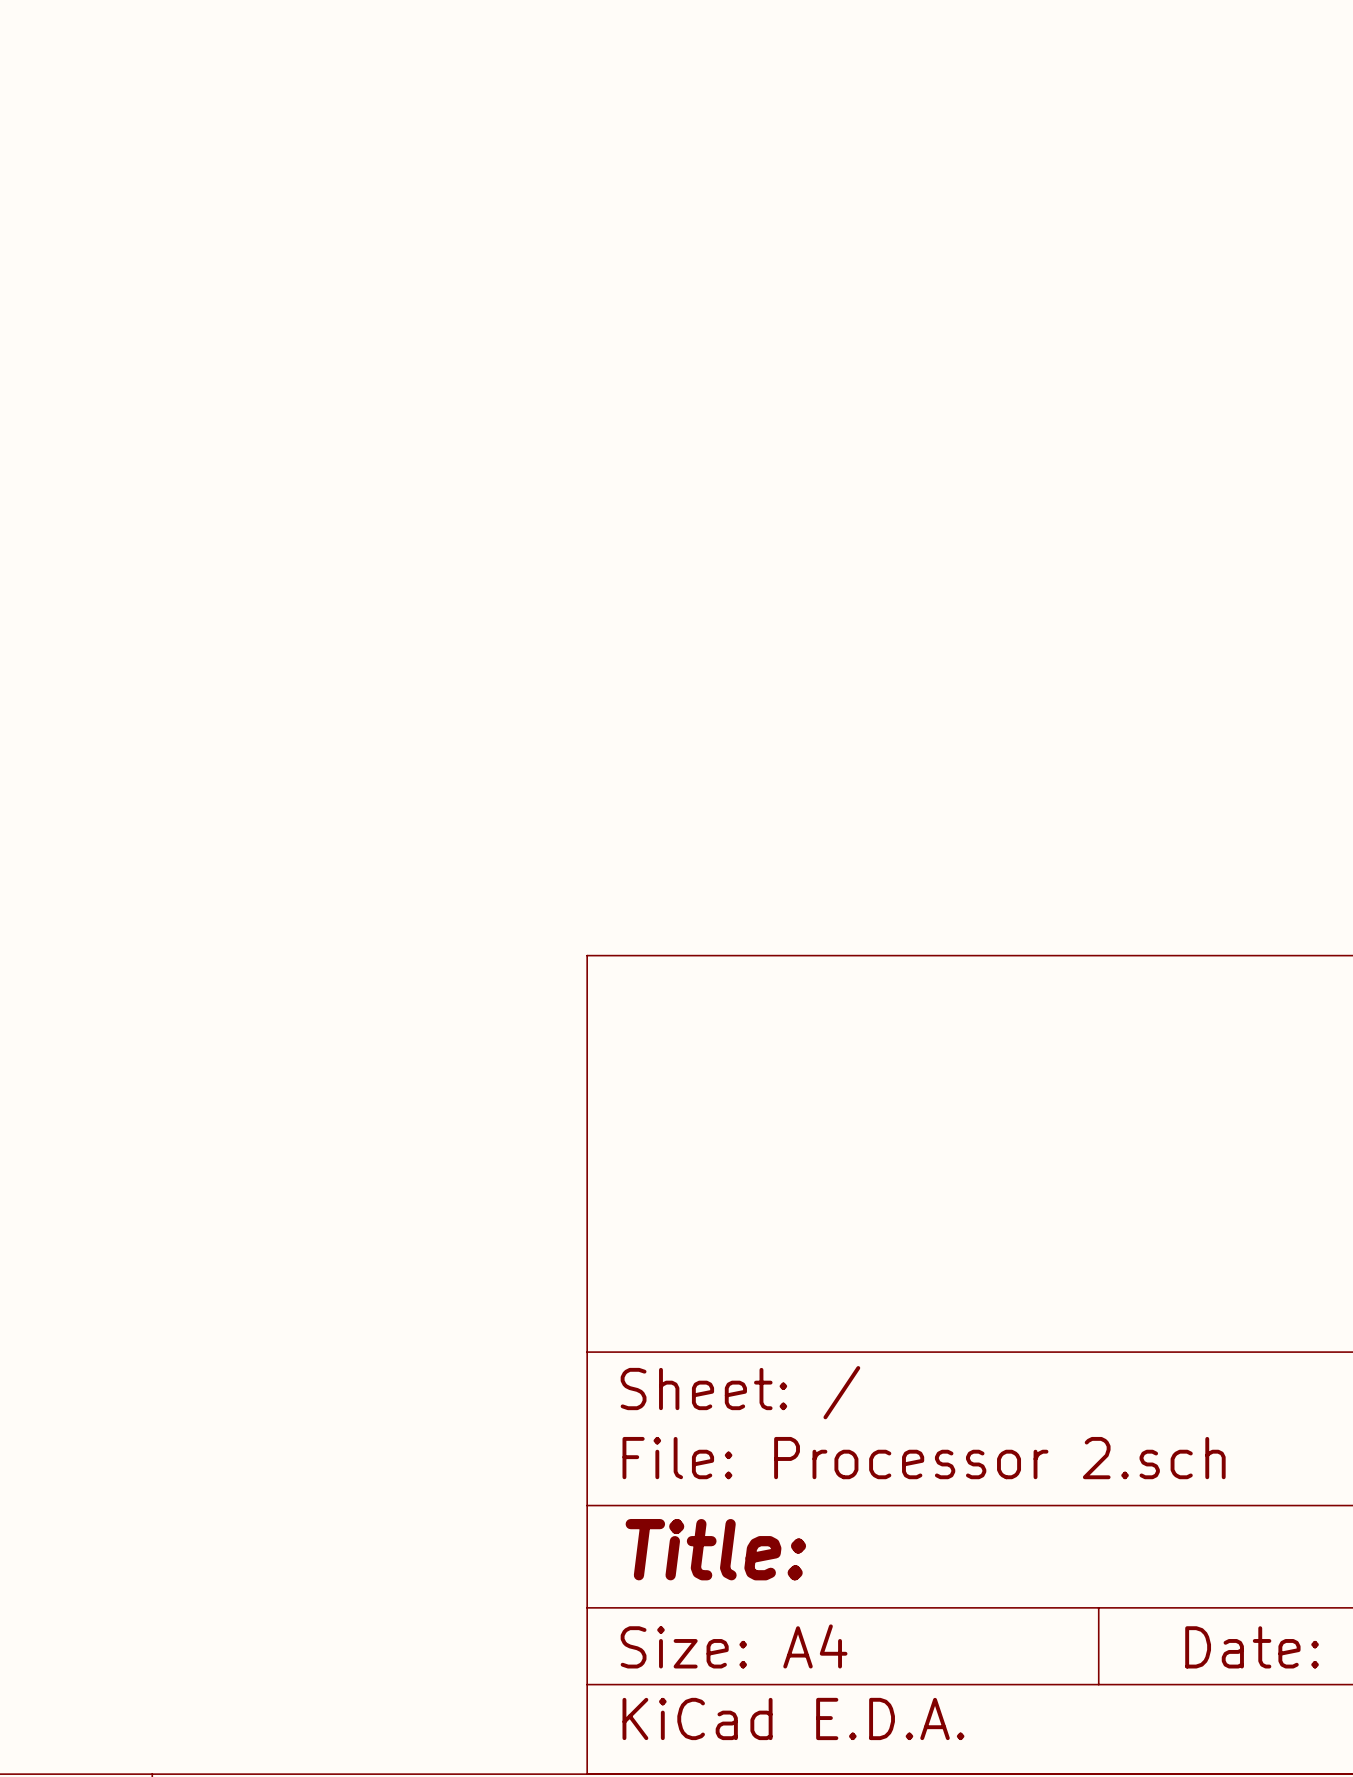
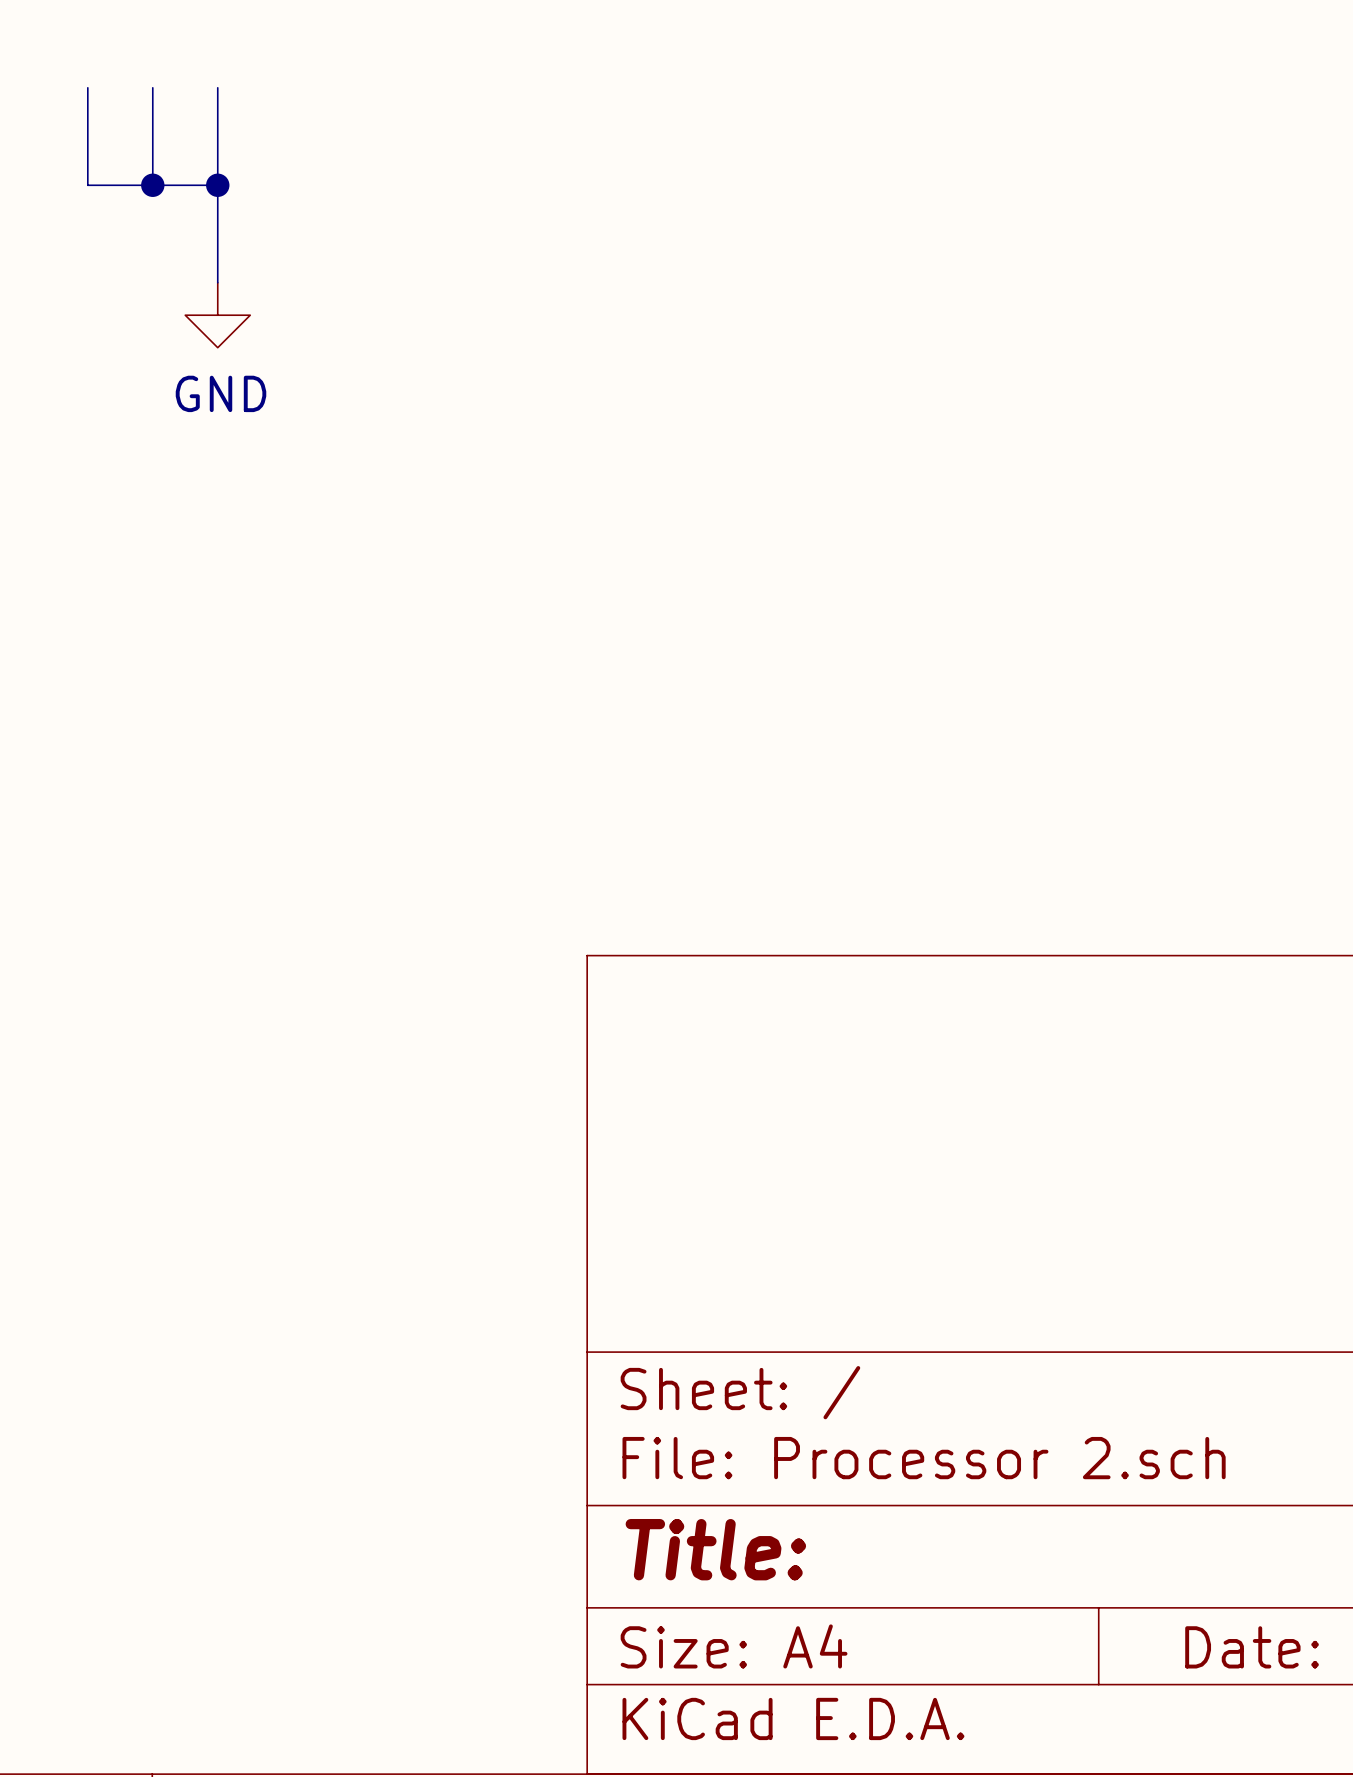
wire: none -> (87, 87) (87, 185) (217, 185)
wire: none -> (152, 87) (152, 185)
wire: none -> (217, 87) (217, 282)
junction: none -> (152, 185)
junction: none -> (217, 185)
power symbol: none -> GND (217, 315)

